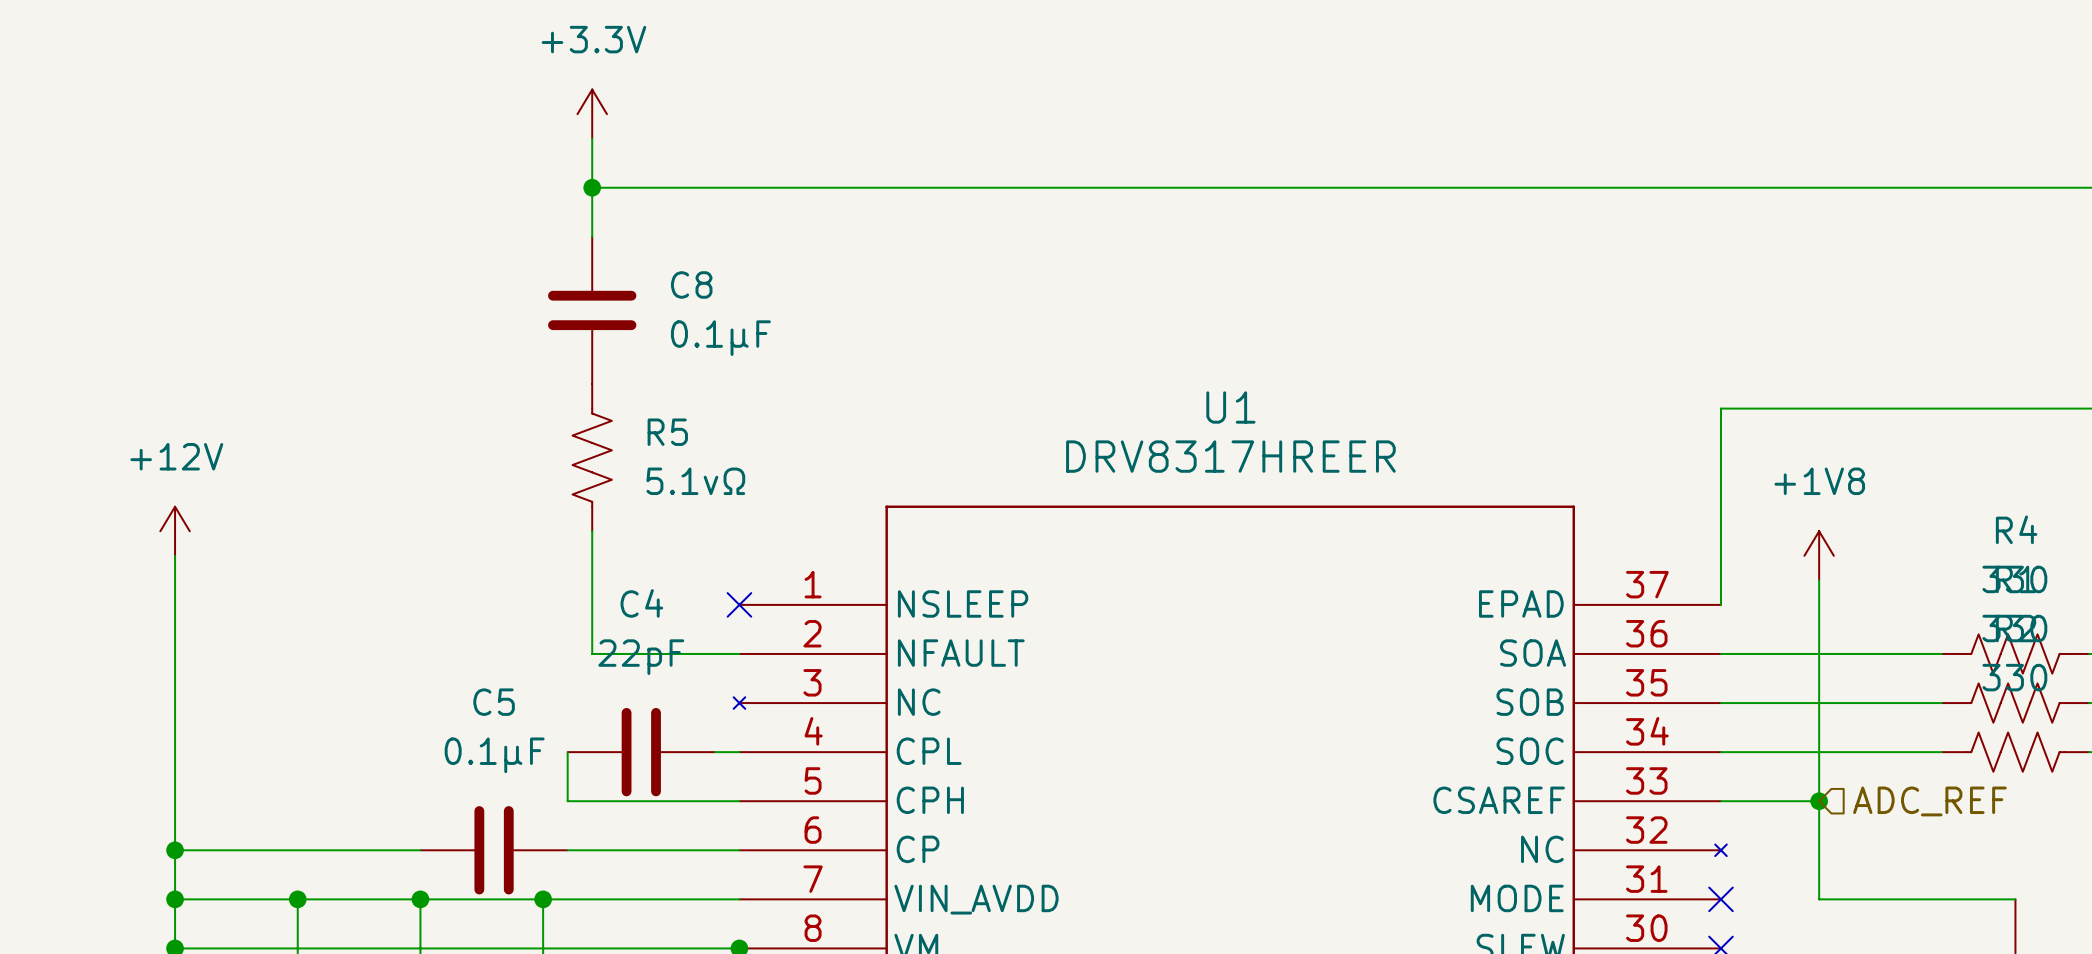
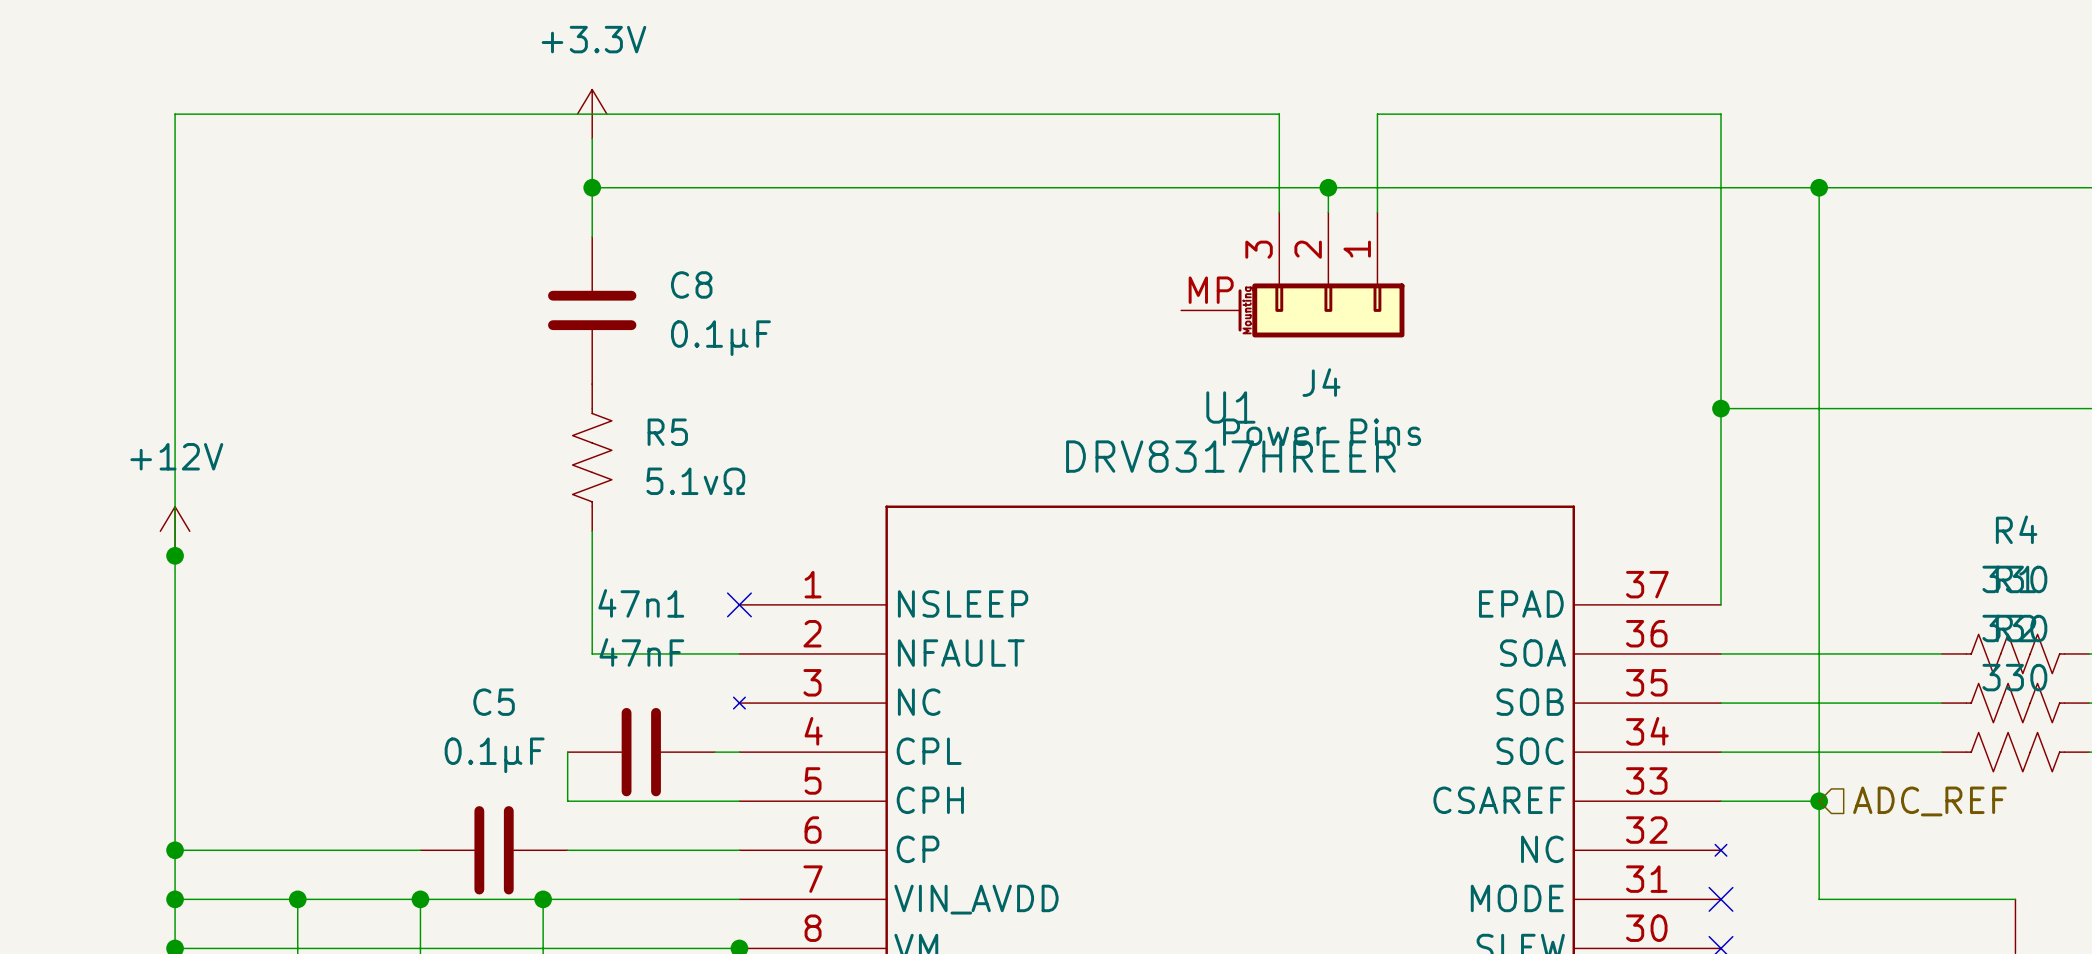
wire: none -> (1328, 187) (1328, 212)
junction: none -> (1328, 187)
wire: none -> (1819, 187) (1819, 580)
junction: none -> (1819, 187)
wire: none -> (1279, 212) (1279, 114) (175, 114) (175, 555)
wire: none -> (1377, 212) (1377, 114) (1720, 114) (1720, 408)
J4: none -> Power Pins (1292, 274)
junction: none -> (1720, 408)
junction: none -> (175, 555)
power symbol: +1V8 (1819, 555) -> none
C4 name: C4 (641, 603) -> 47n1 (641, 603)
C4 value: 22pF (641, 657) -> 47nF (641, 652)

